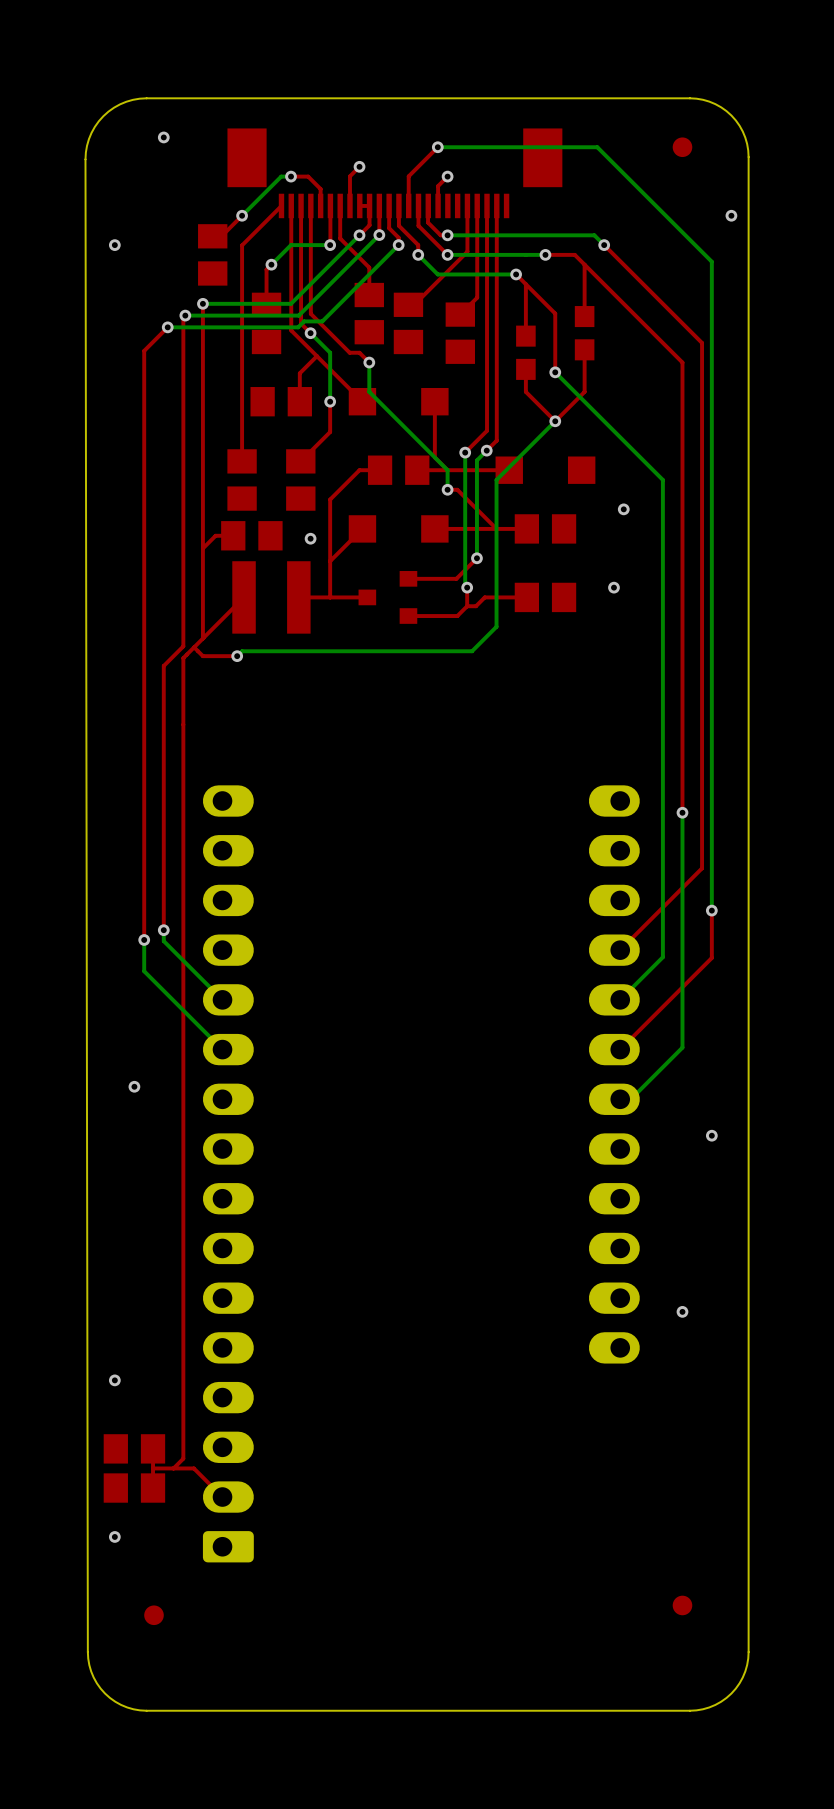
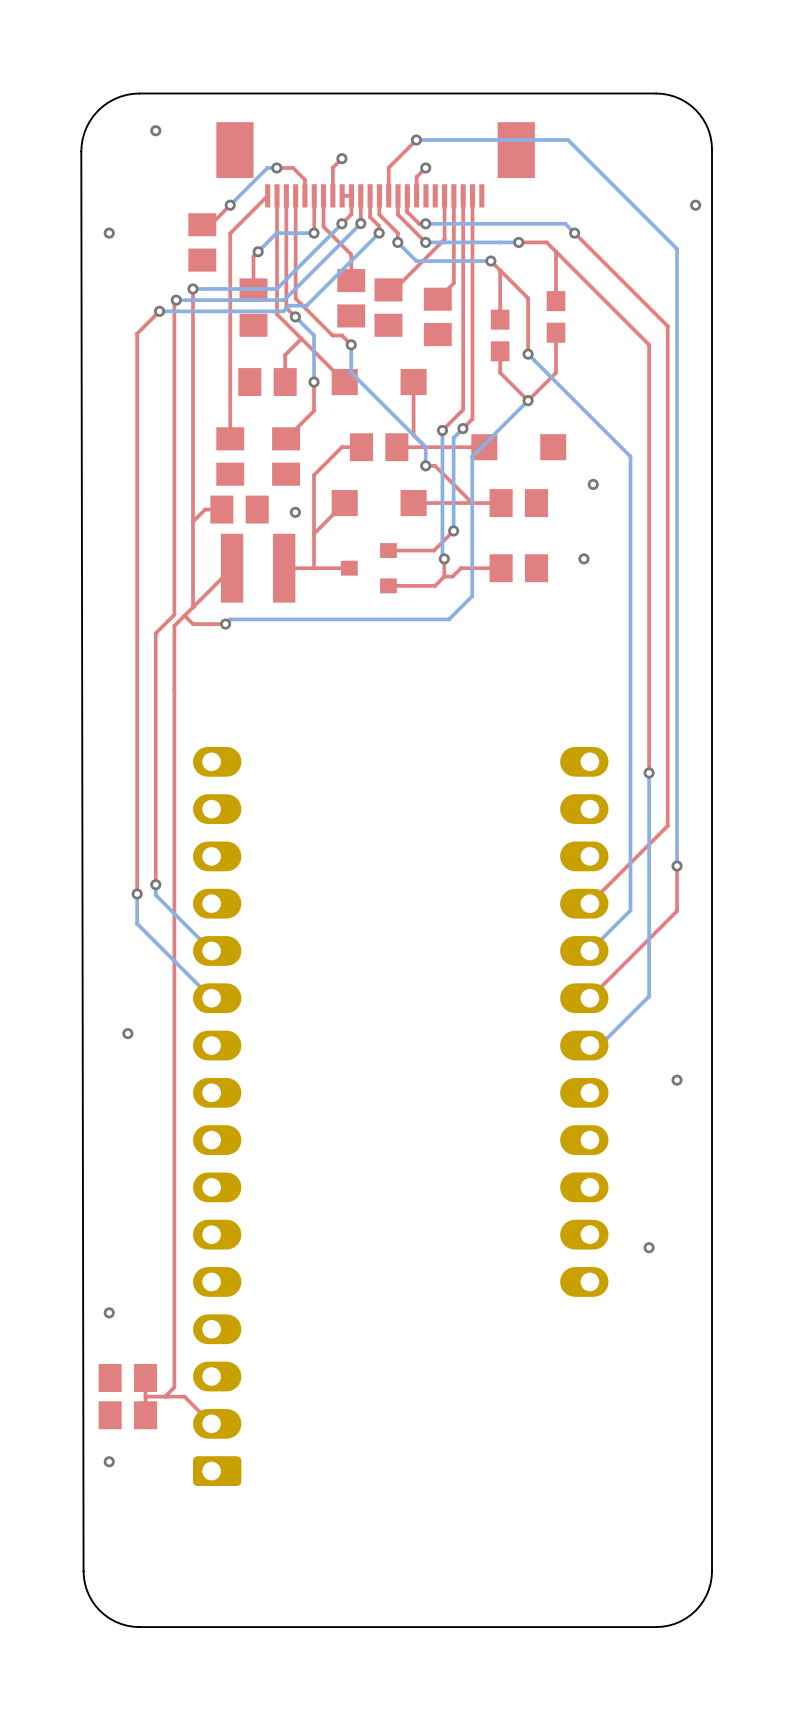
part: (682, 147) -> none
part: (682, 1605) -> none
part: (153, 1615) -> none

